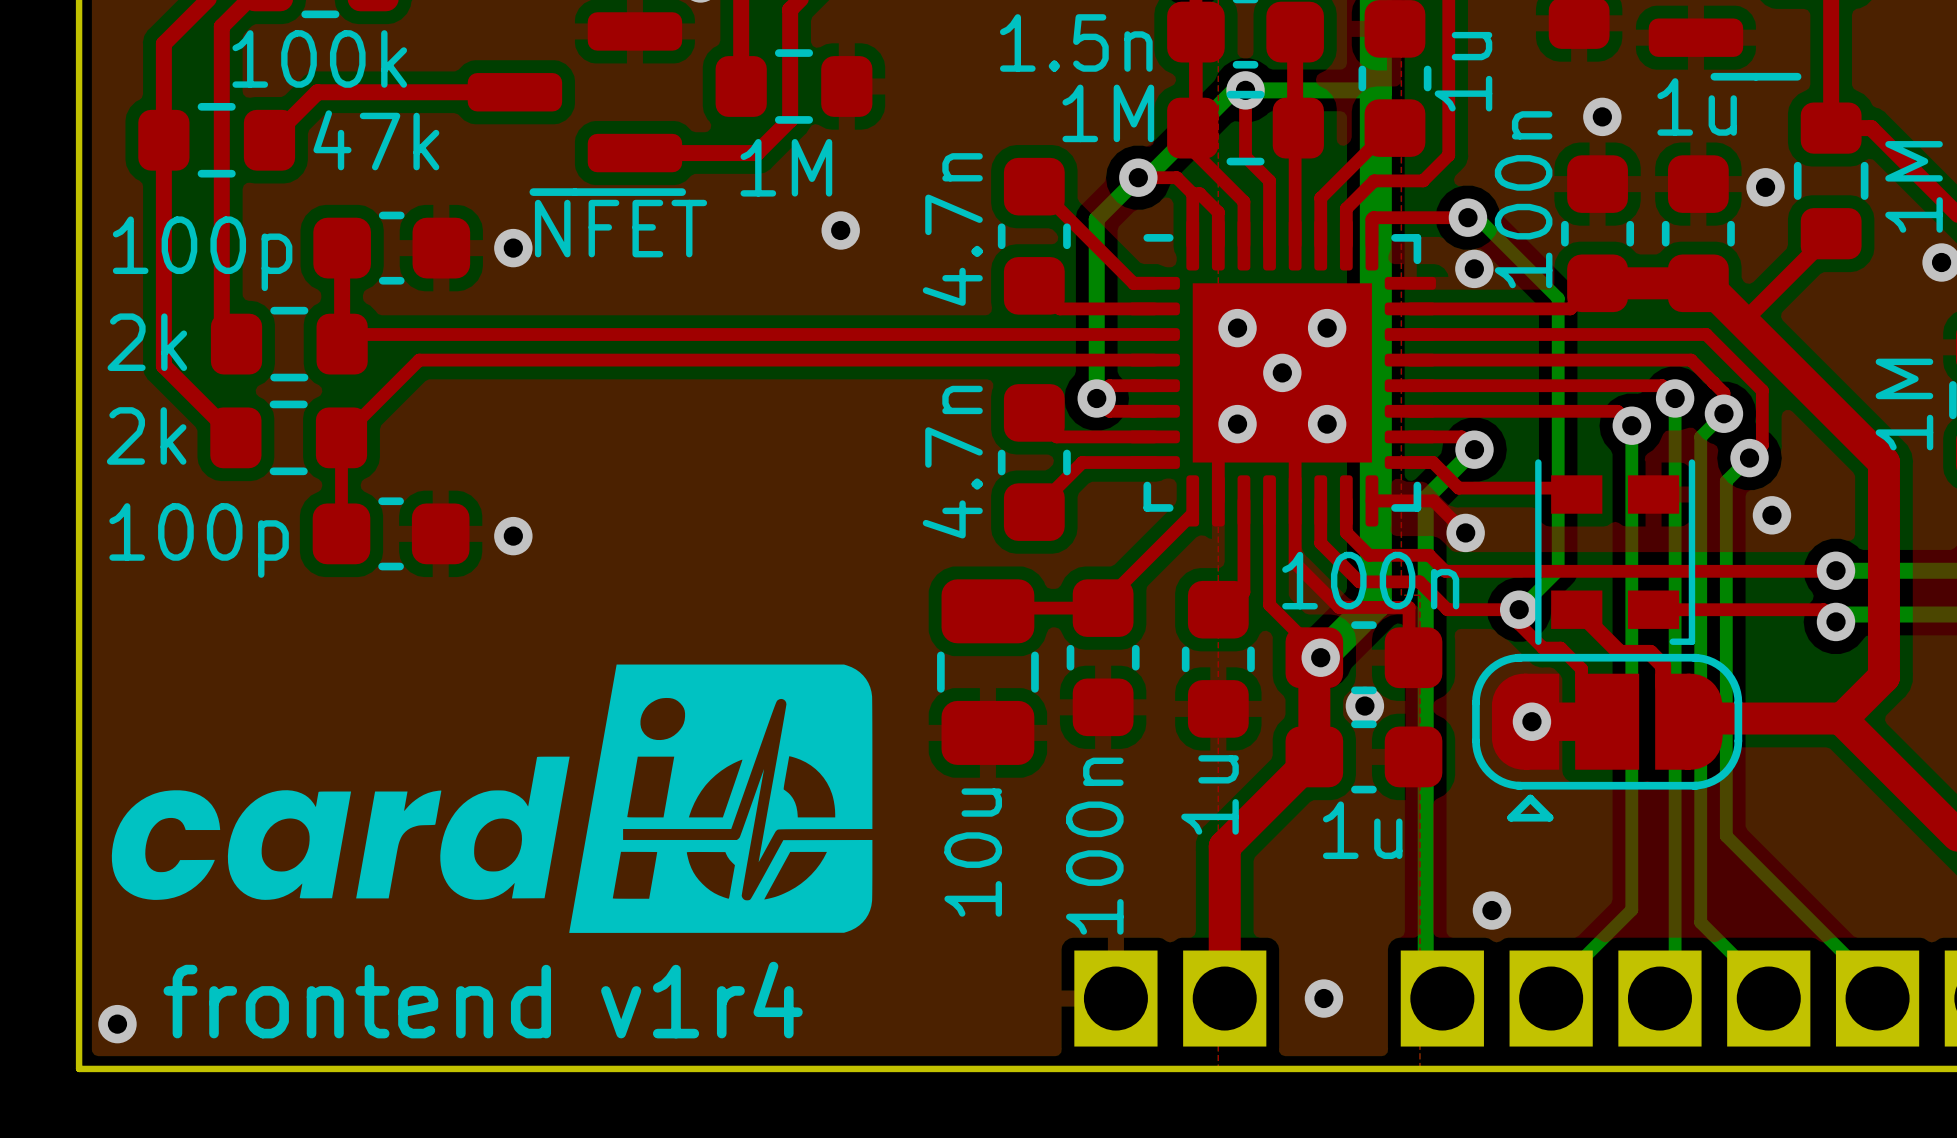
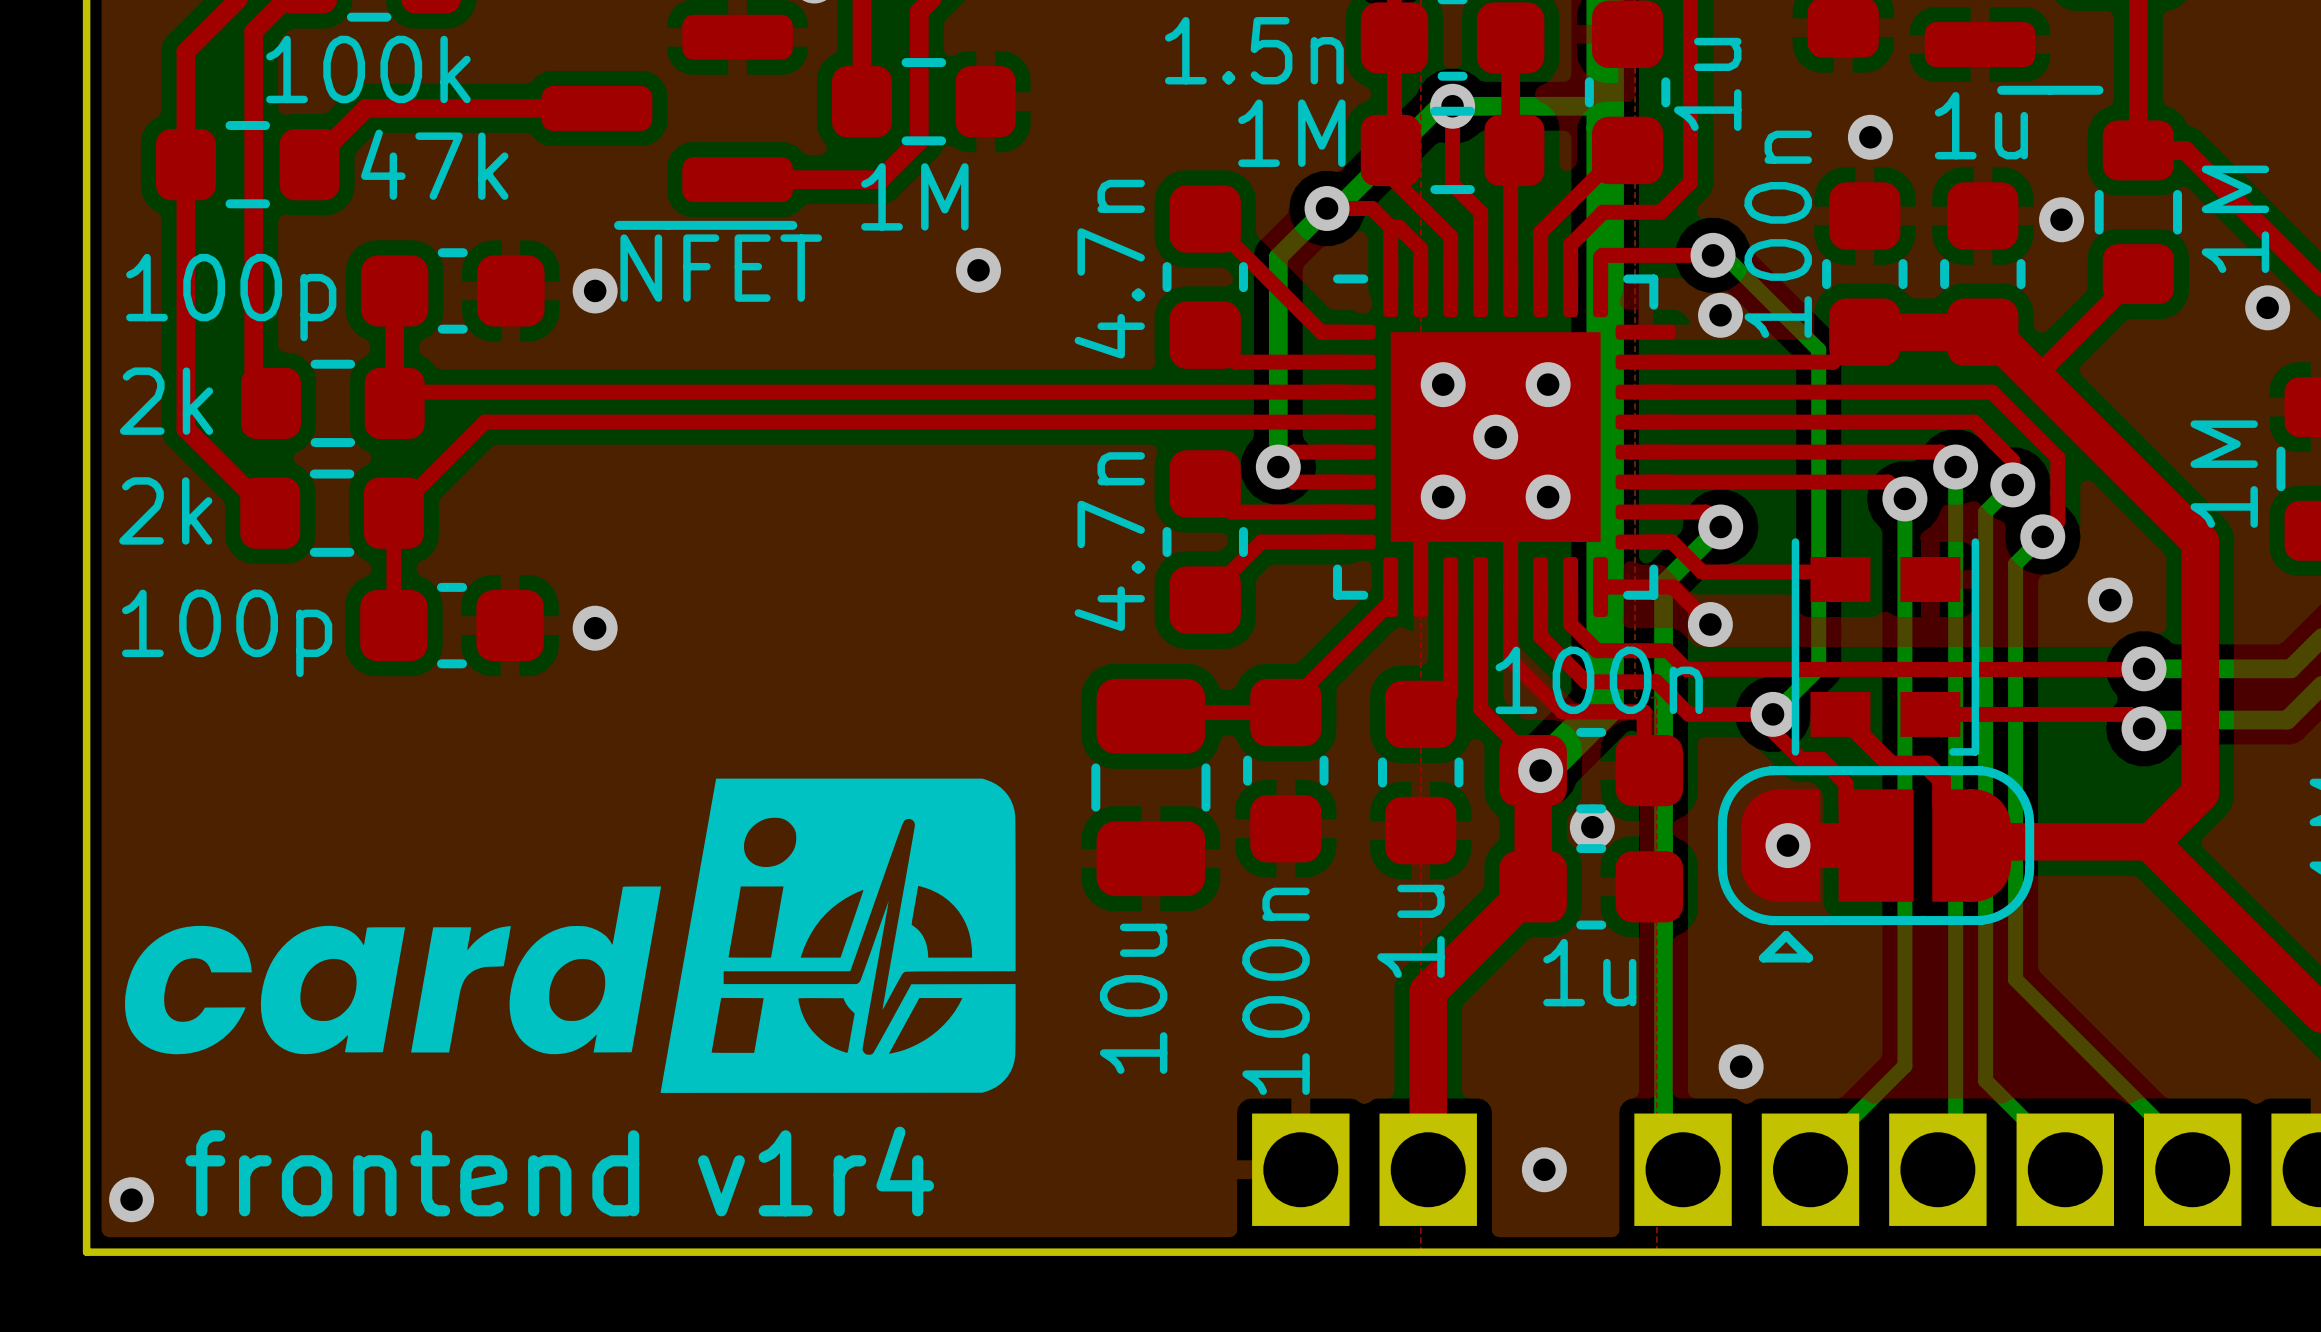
via position: (1771, 515) -> (2110, 600)

